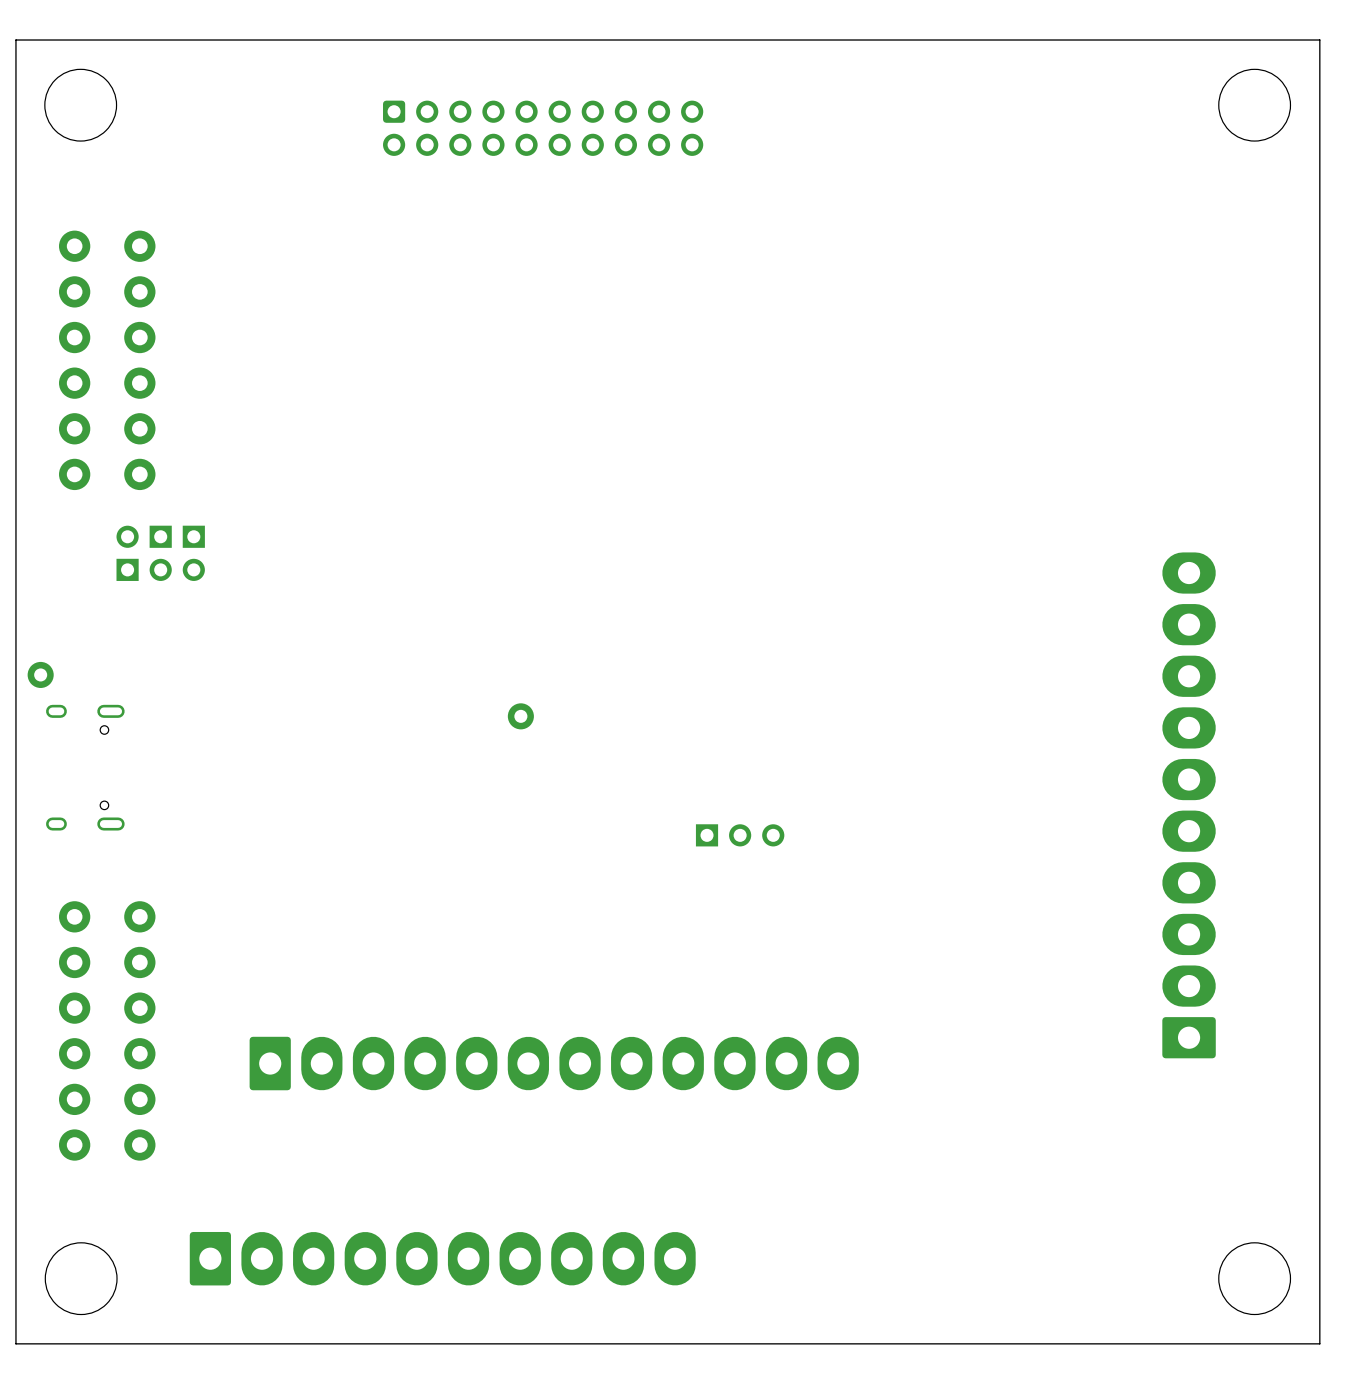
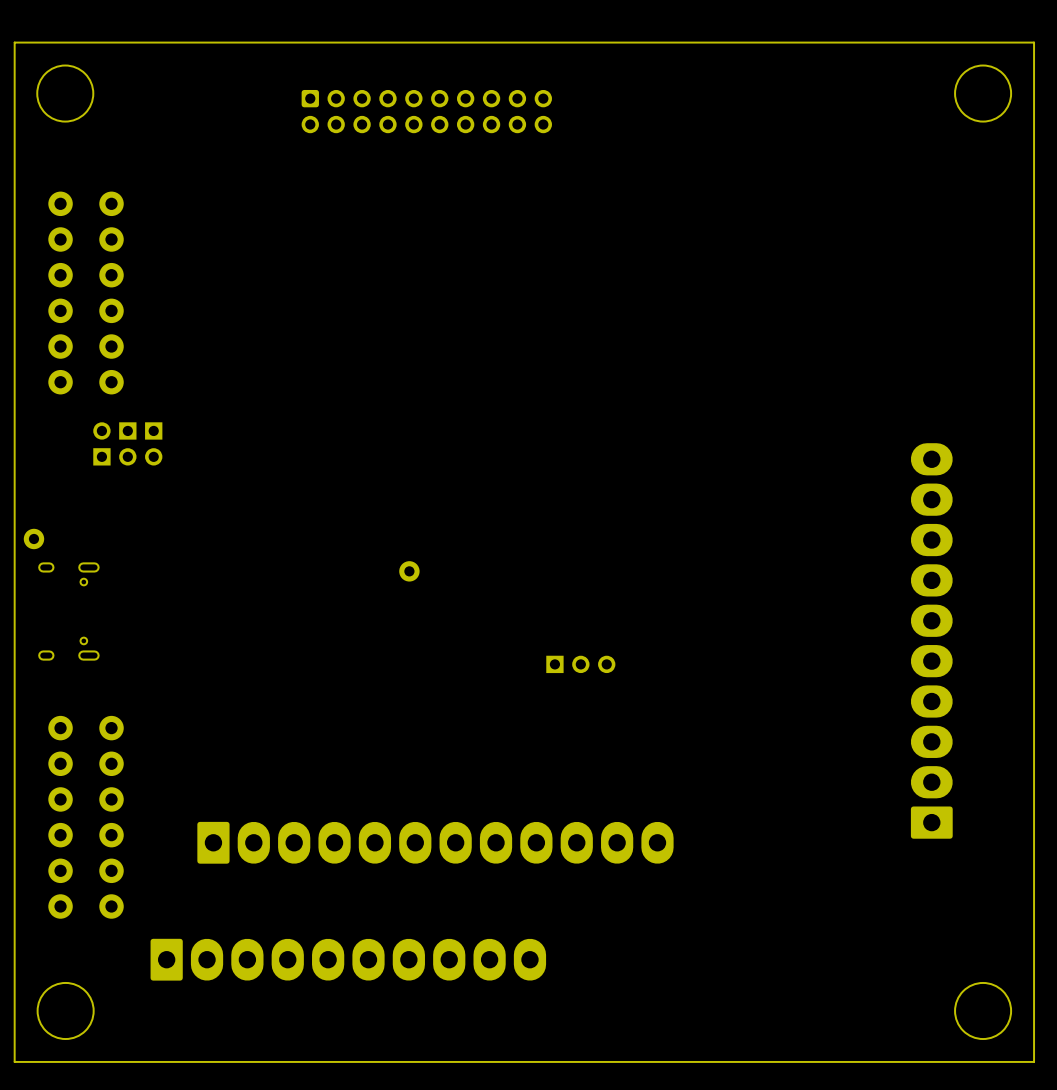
part position: (442, 1258) -> (348, 959)

